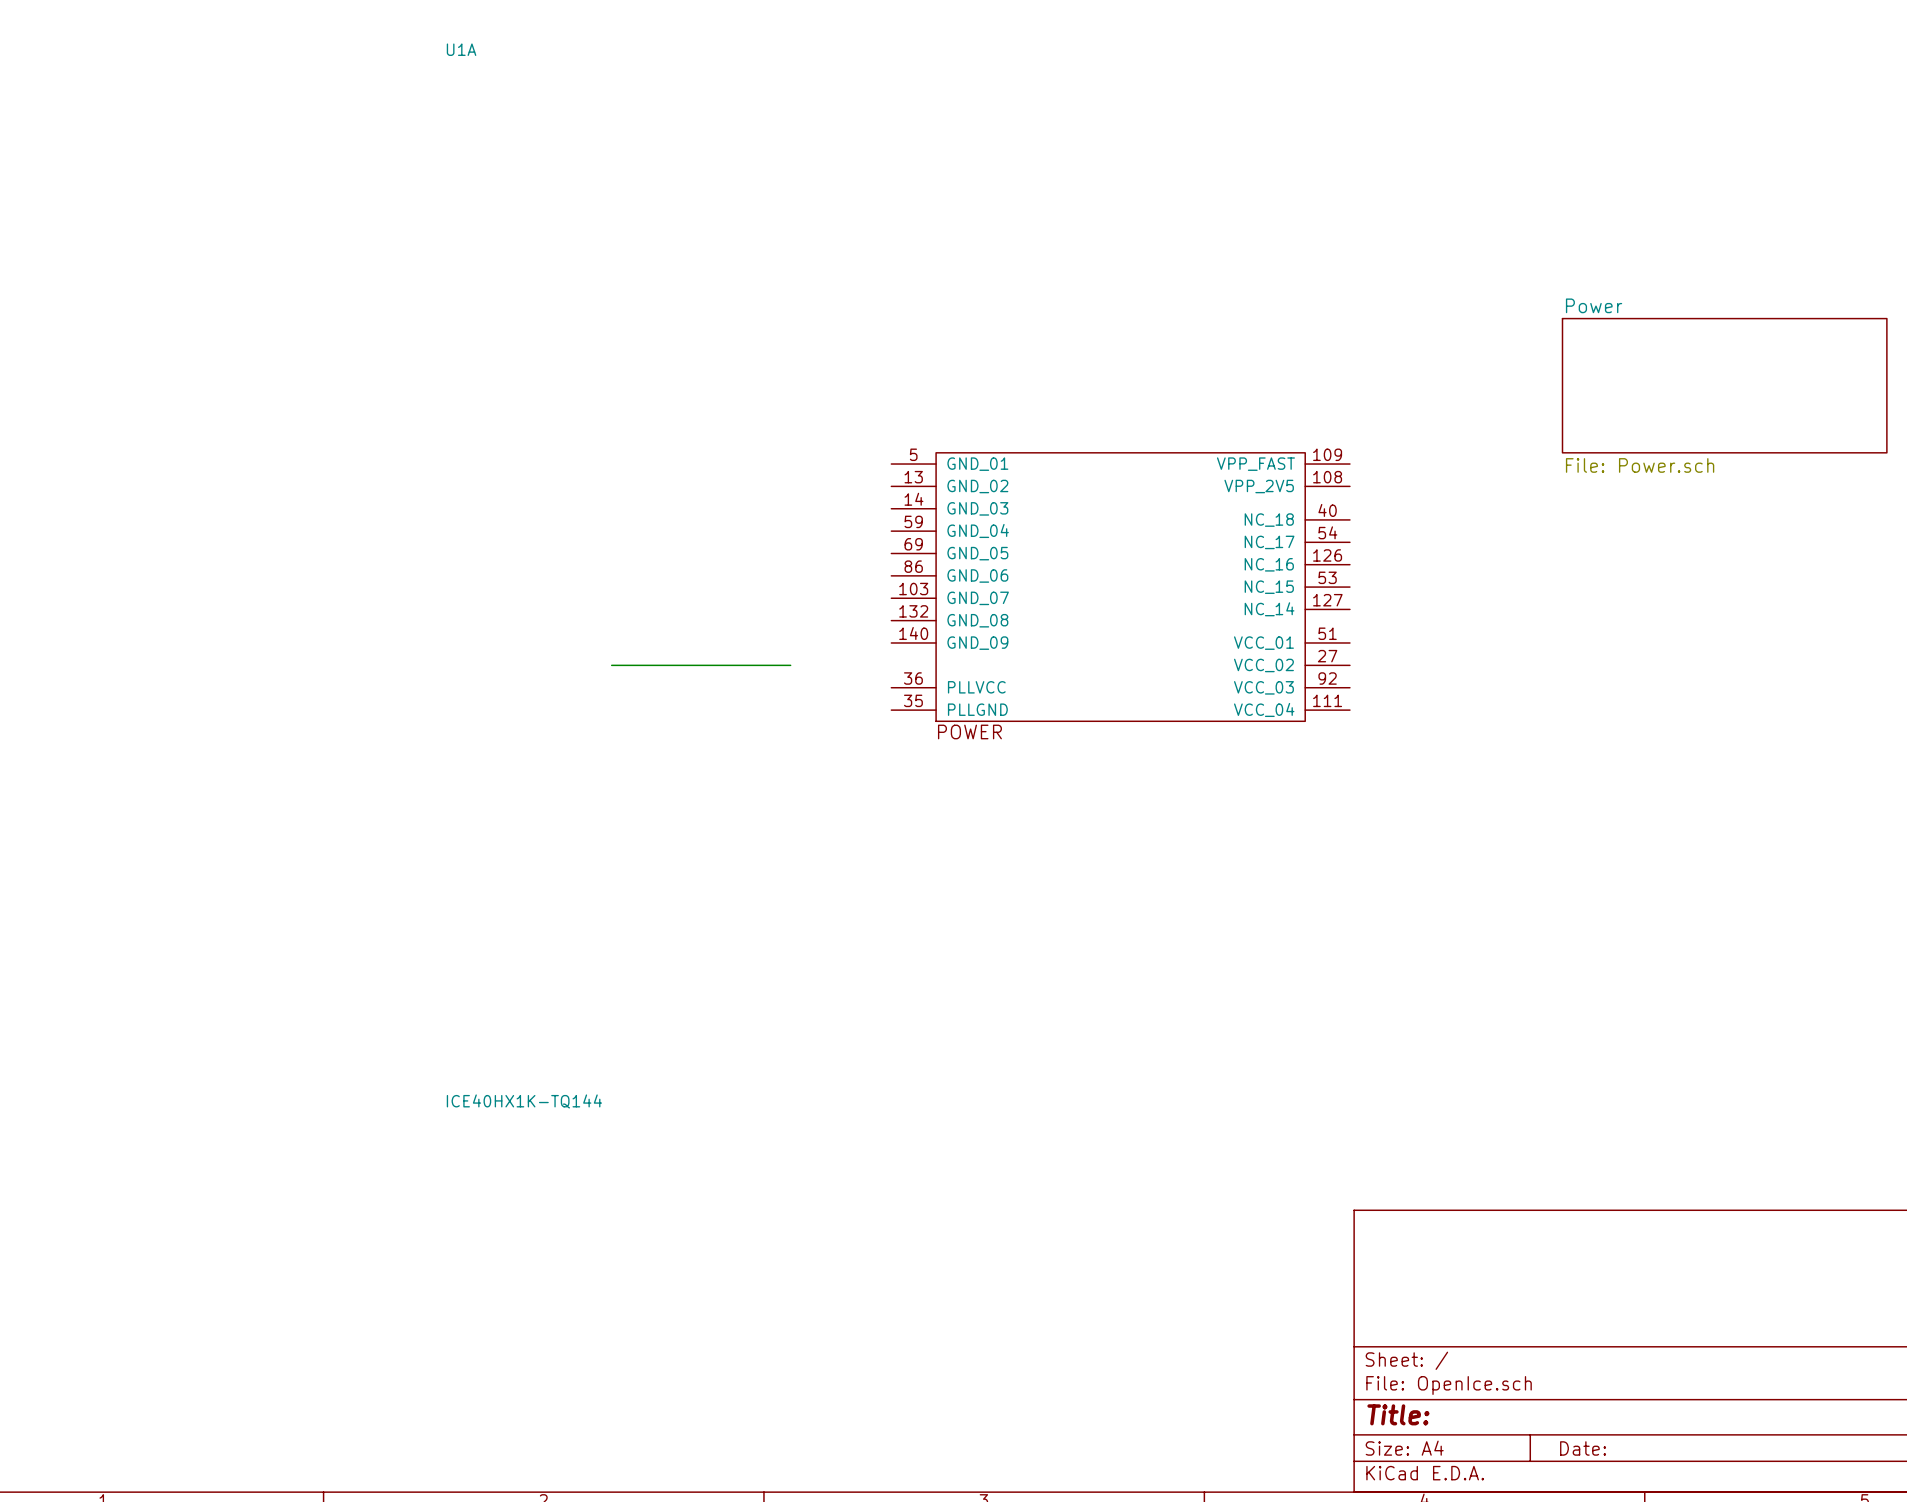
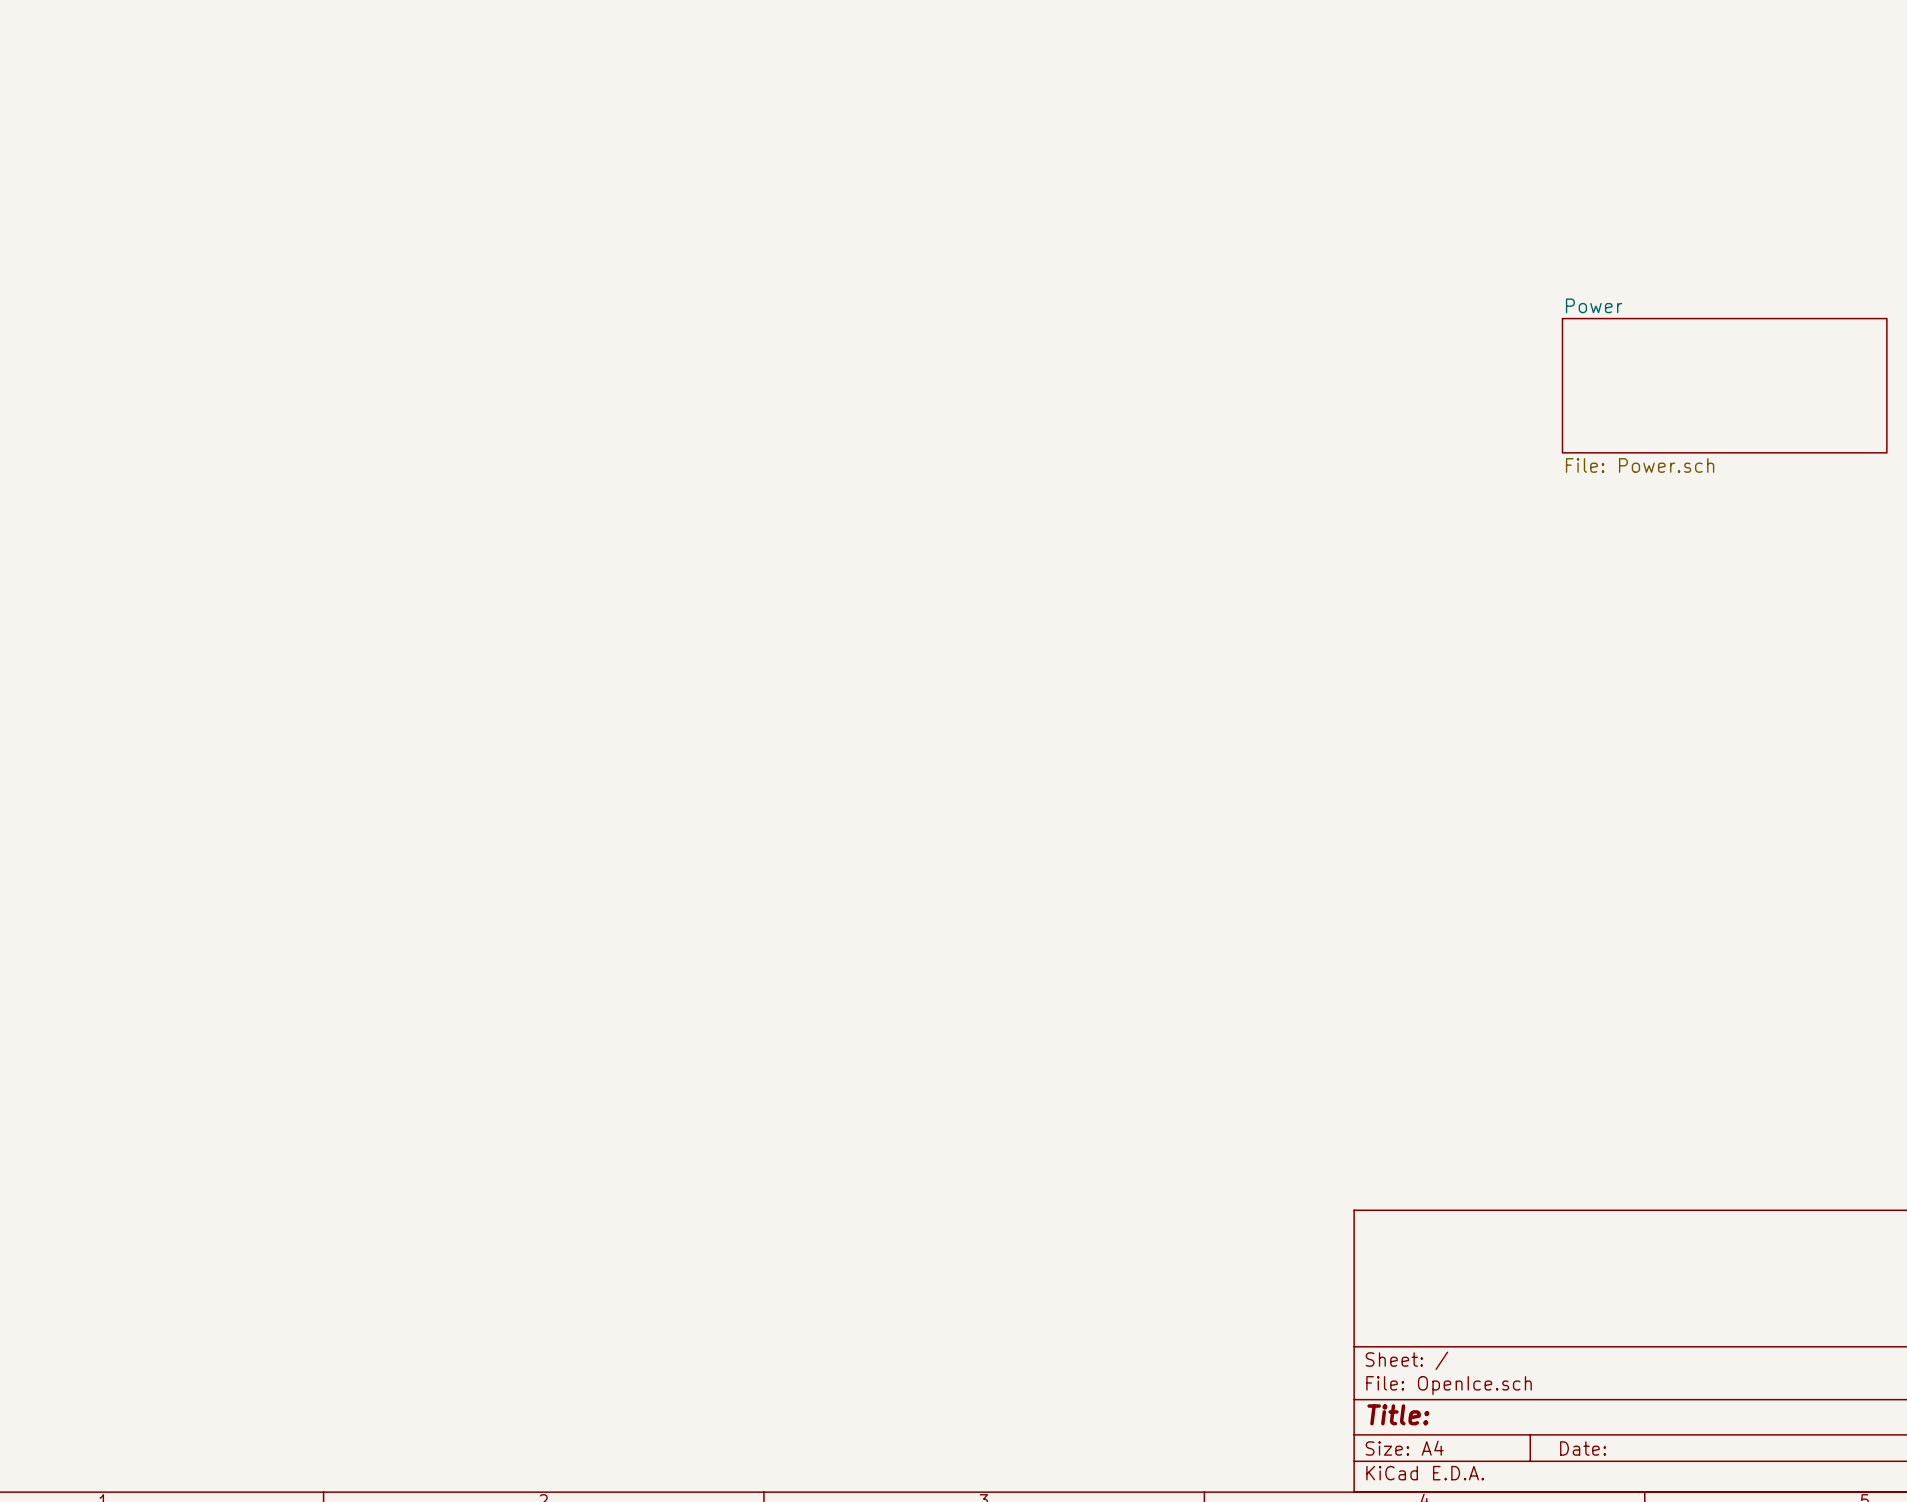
U1A: ICE40HX1K-TQ144 (1120, 587) -> none
wire: (611, 665) (790, 665) -> none

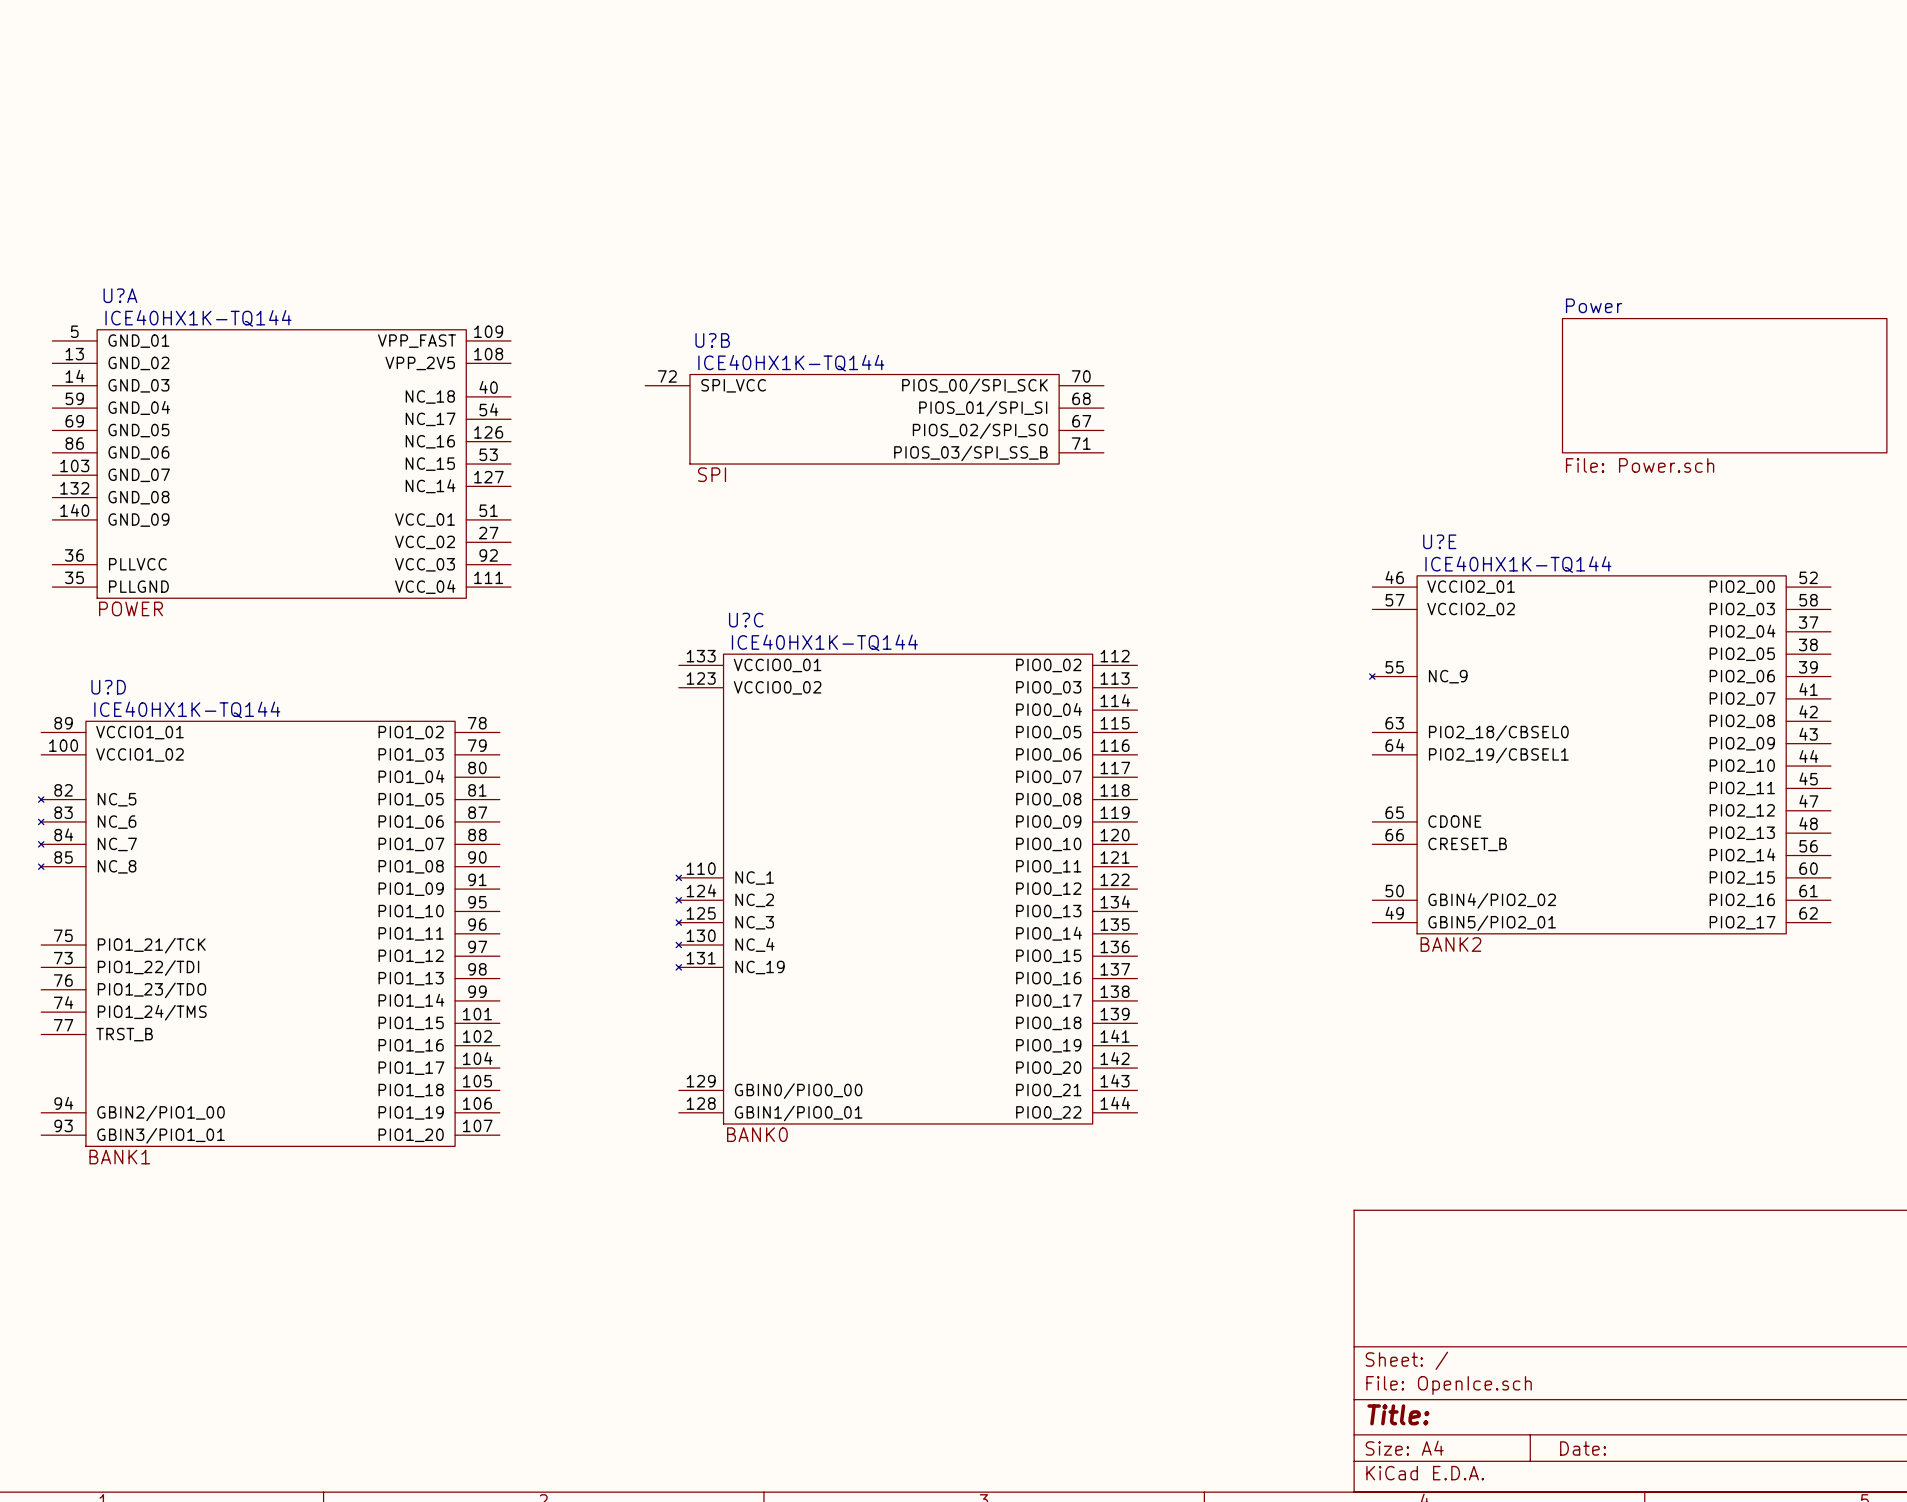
U?B: none -> ICE40HX1K-TQ144 (874, 419)
U?A: none -> ICE40HX1K-TQ144 (281, 464)
U?E: none -> ICE40HX1K-TQ144 (1600, 754)
U?C: none -> ICE40HX1K-TQ144 (906, 889)
U?D: none -> ICE40HX1K-TQ144 (269, 933)

